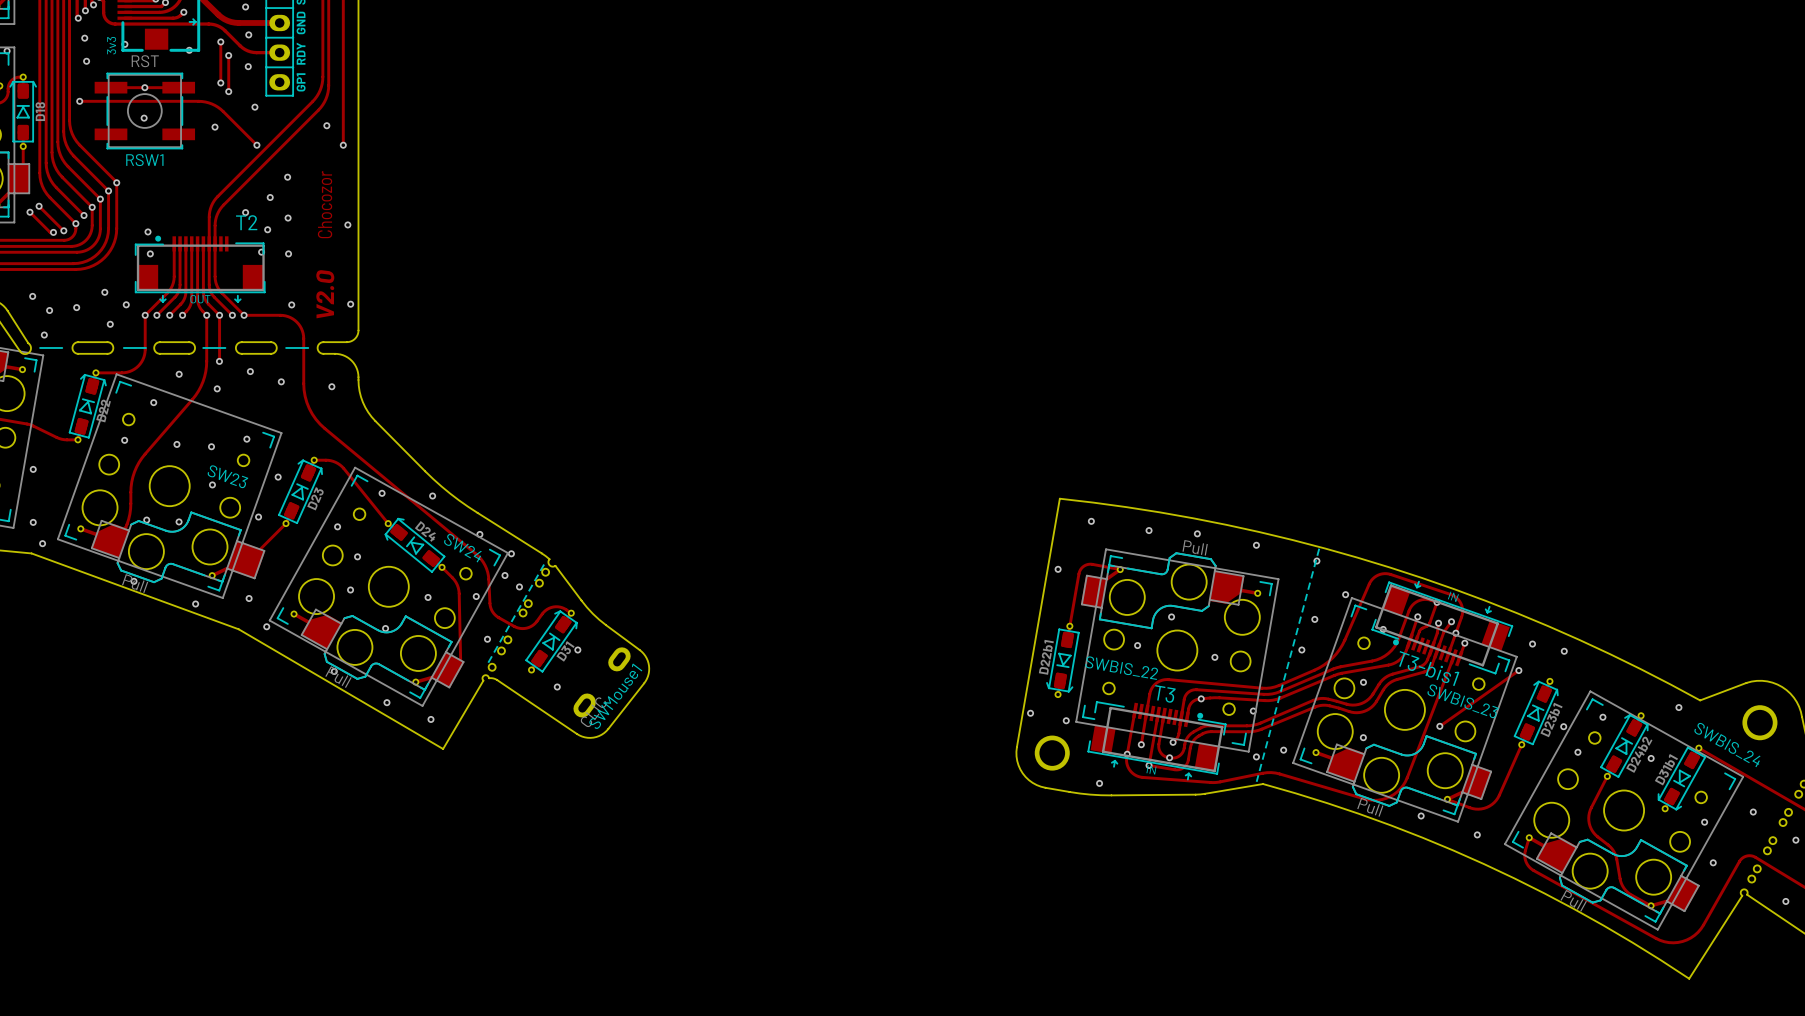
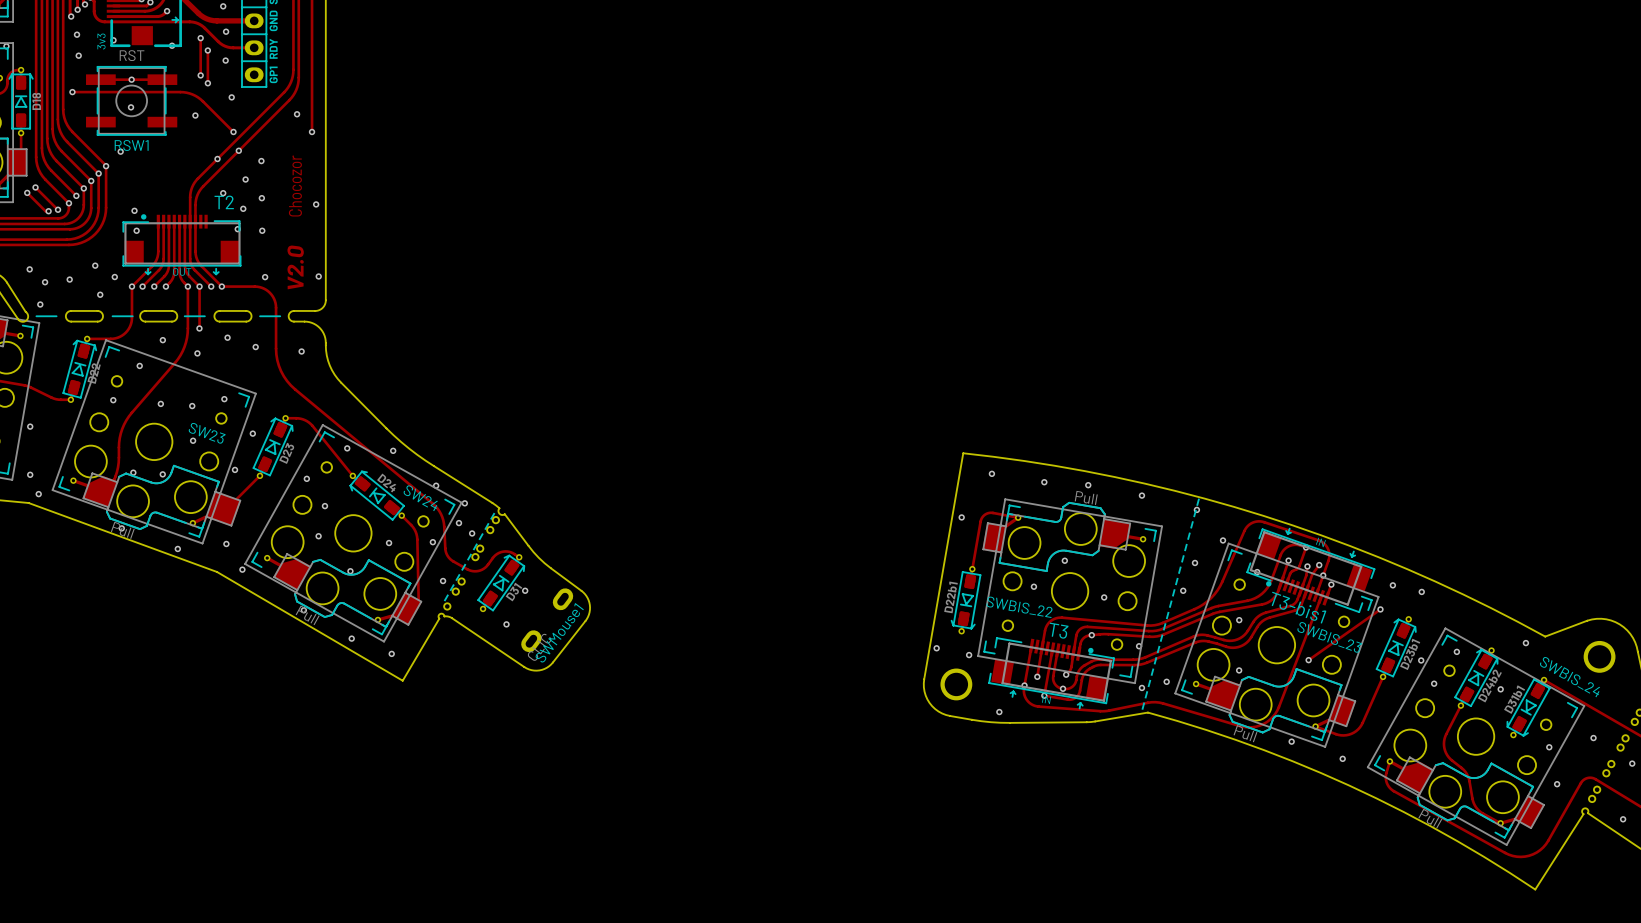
via: none -> (238, 150)
via: none -> (120, 151)
via: none -> (217, 158)

